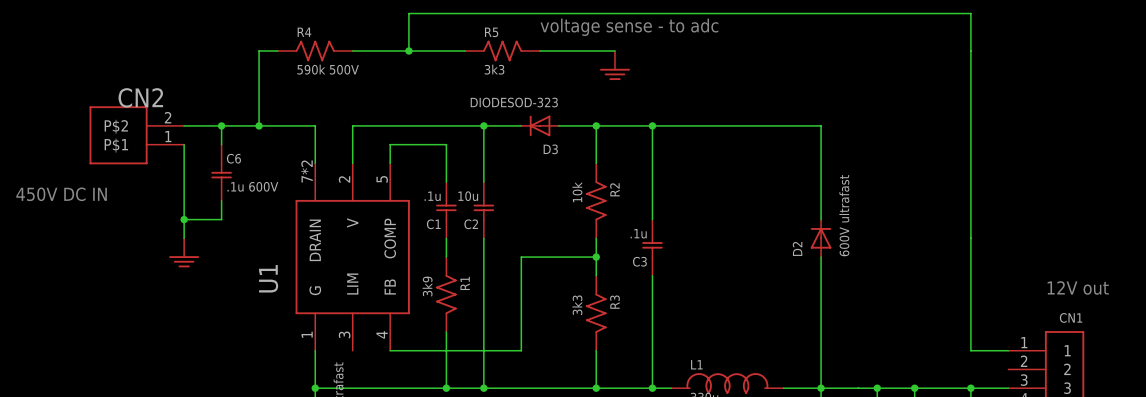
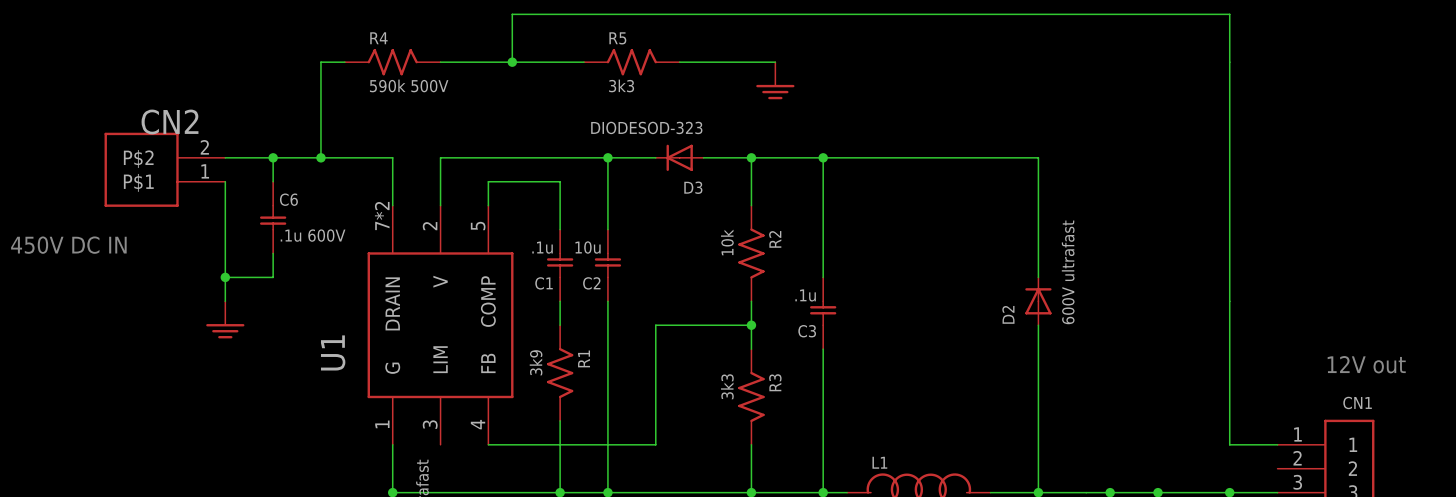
text: voltage sense - to adc (629, 27) -> none

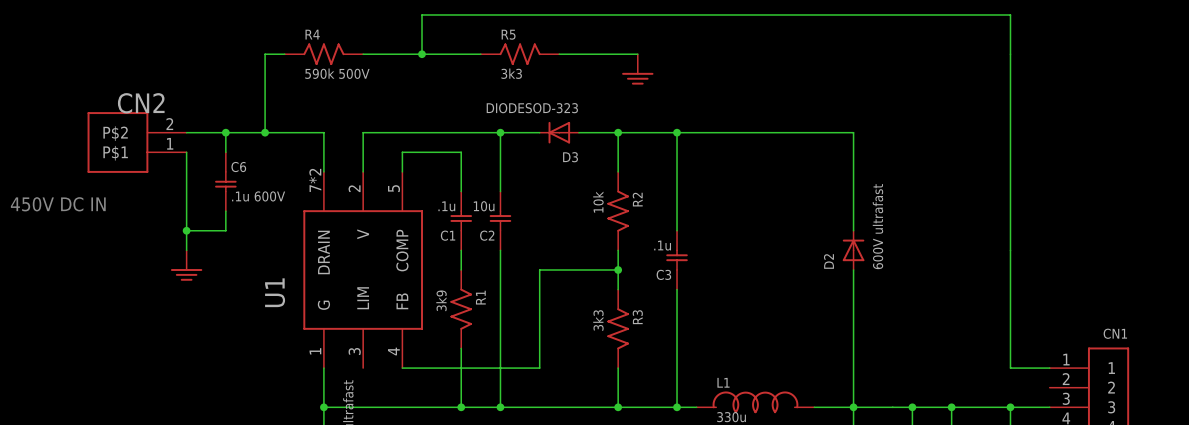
text: 12V out (1366, 364) -> none

